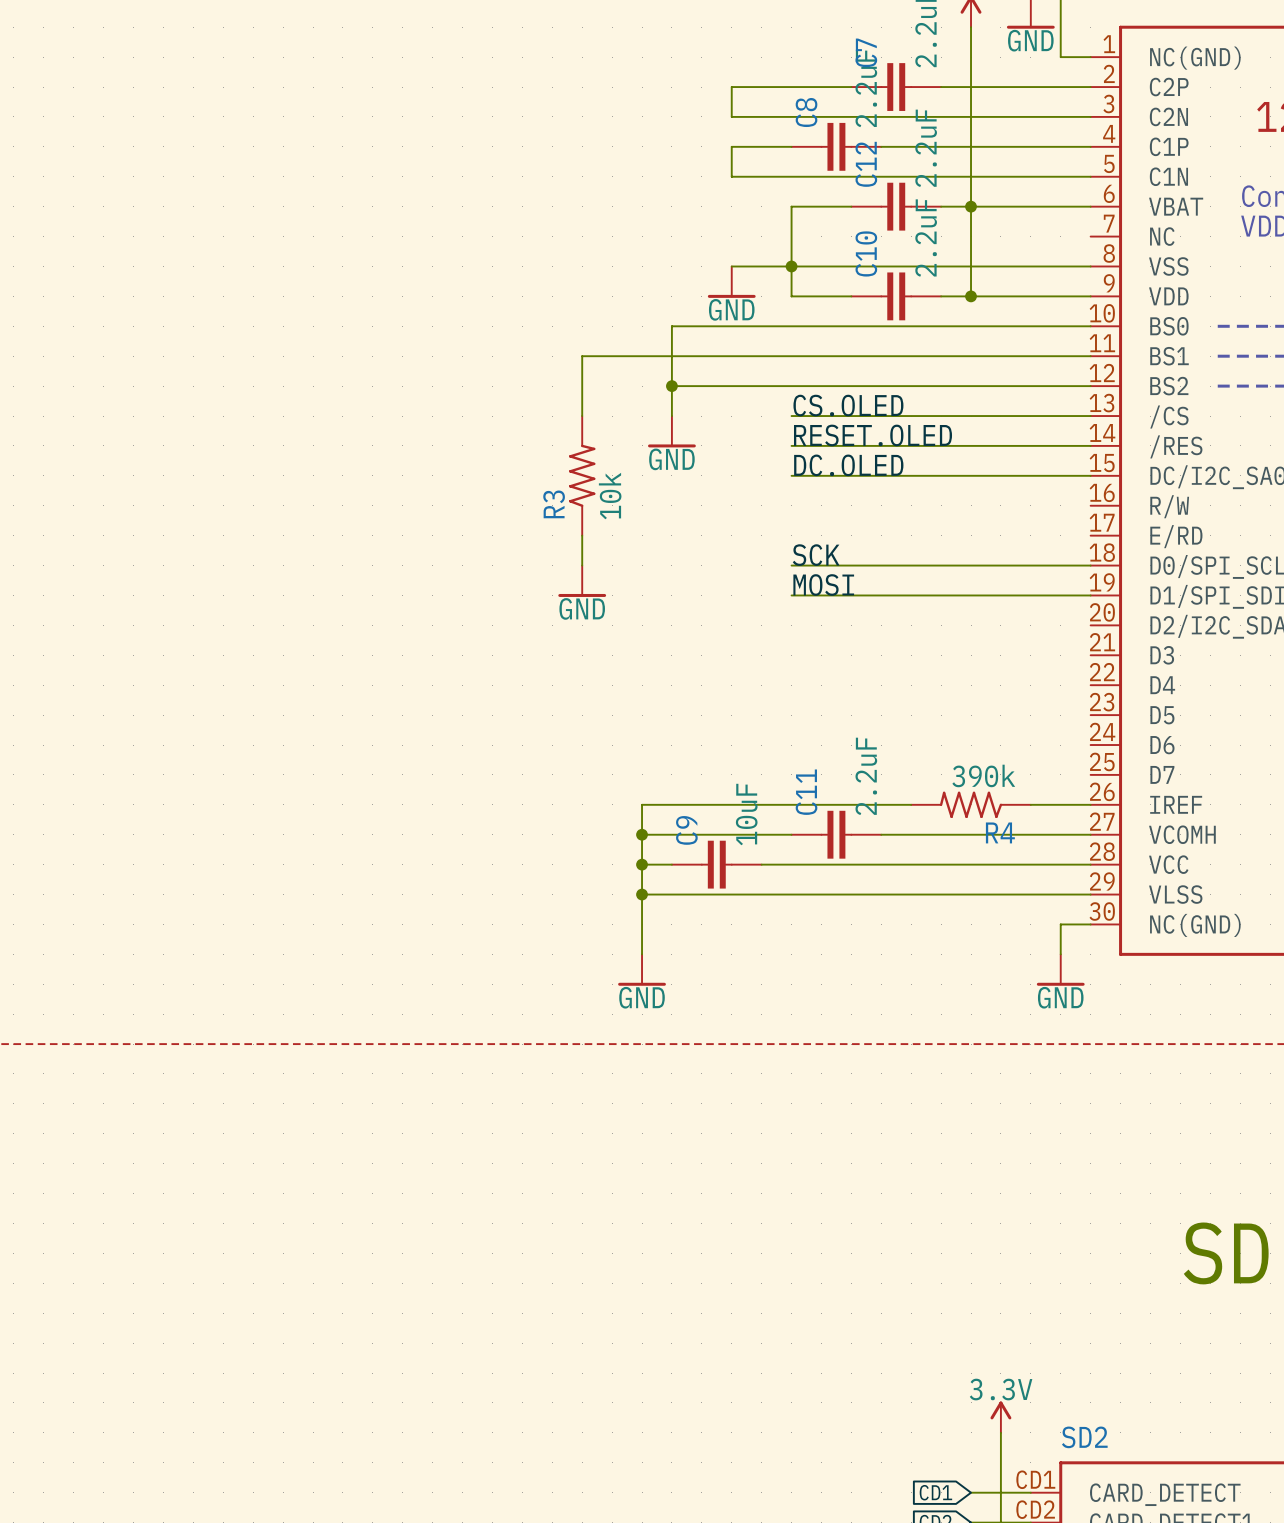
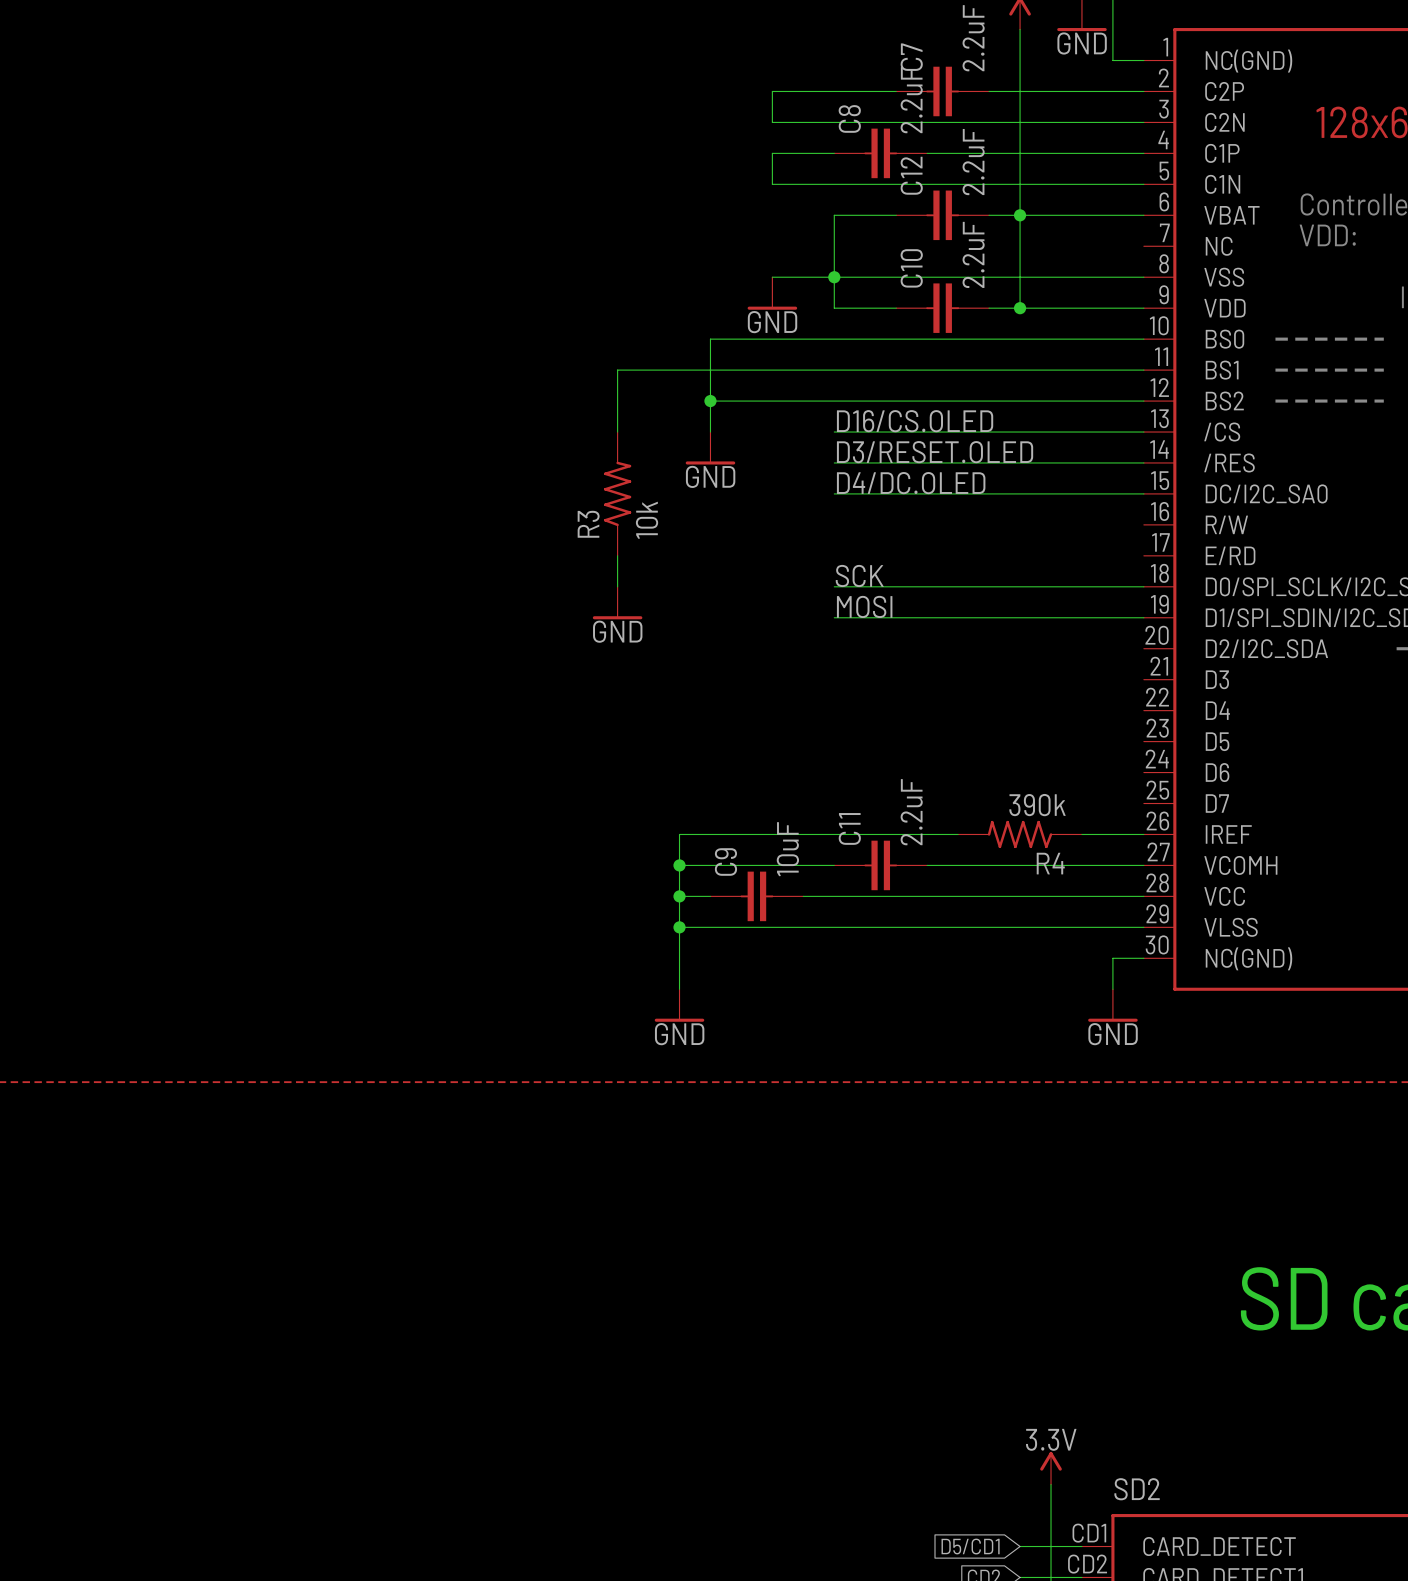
label: CS.OLED (848, 405) -> D16/CS.OLED (915, 421)
label: RESET.OLED (873, 435) -> D3/RESET.OLED (935, 452)
label: DC.OLED (848, 465) -> D4/DC.OLED (911, 483)
global label: CD1 (935, 1492) -> D5/CD1 (970, 1546)

